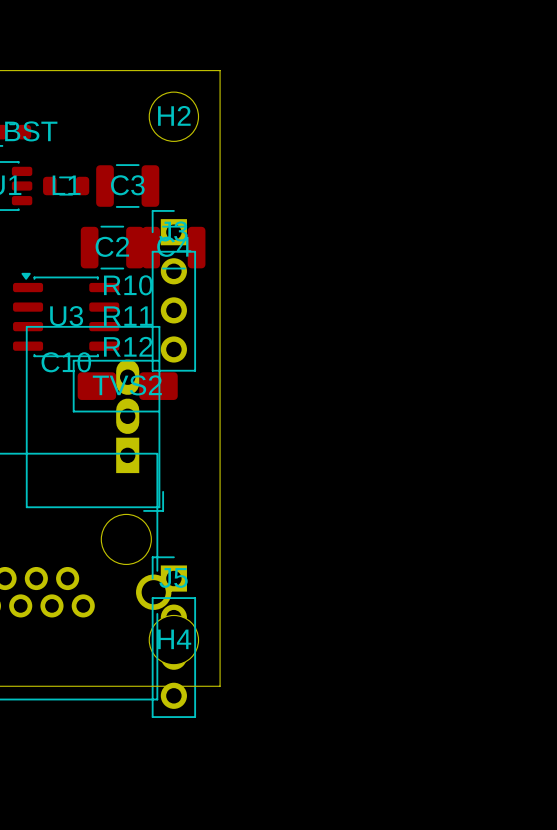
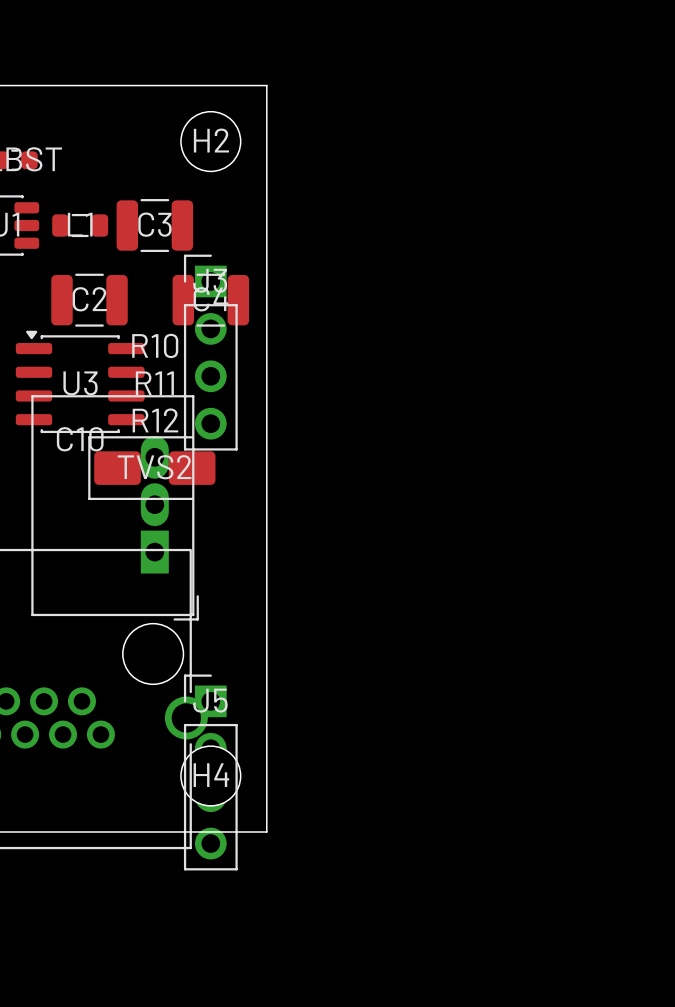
C2 position: (112, 247) -> (89, 300)

